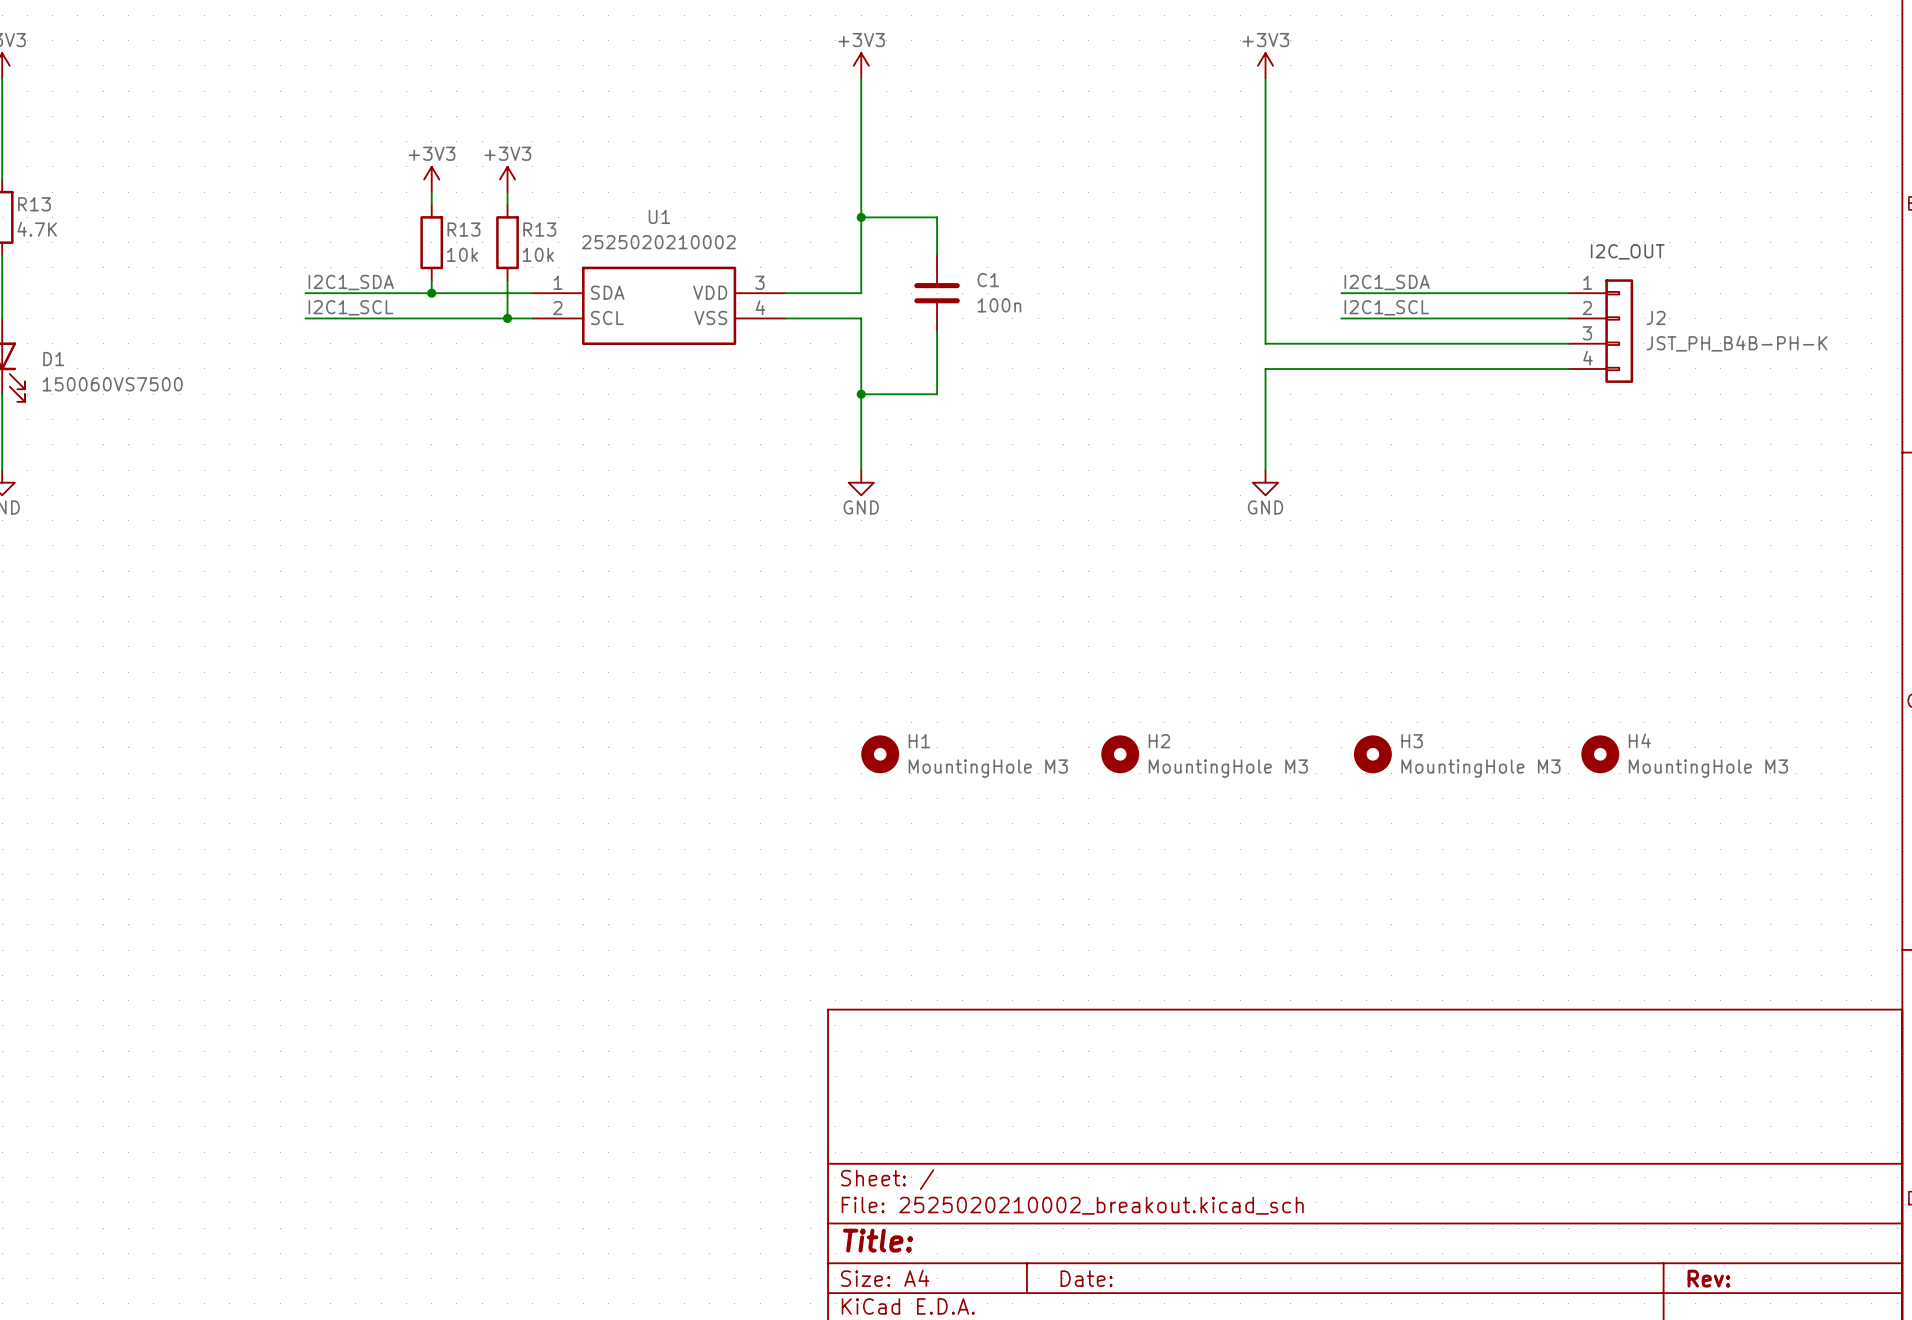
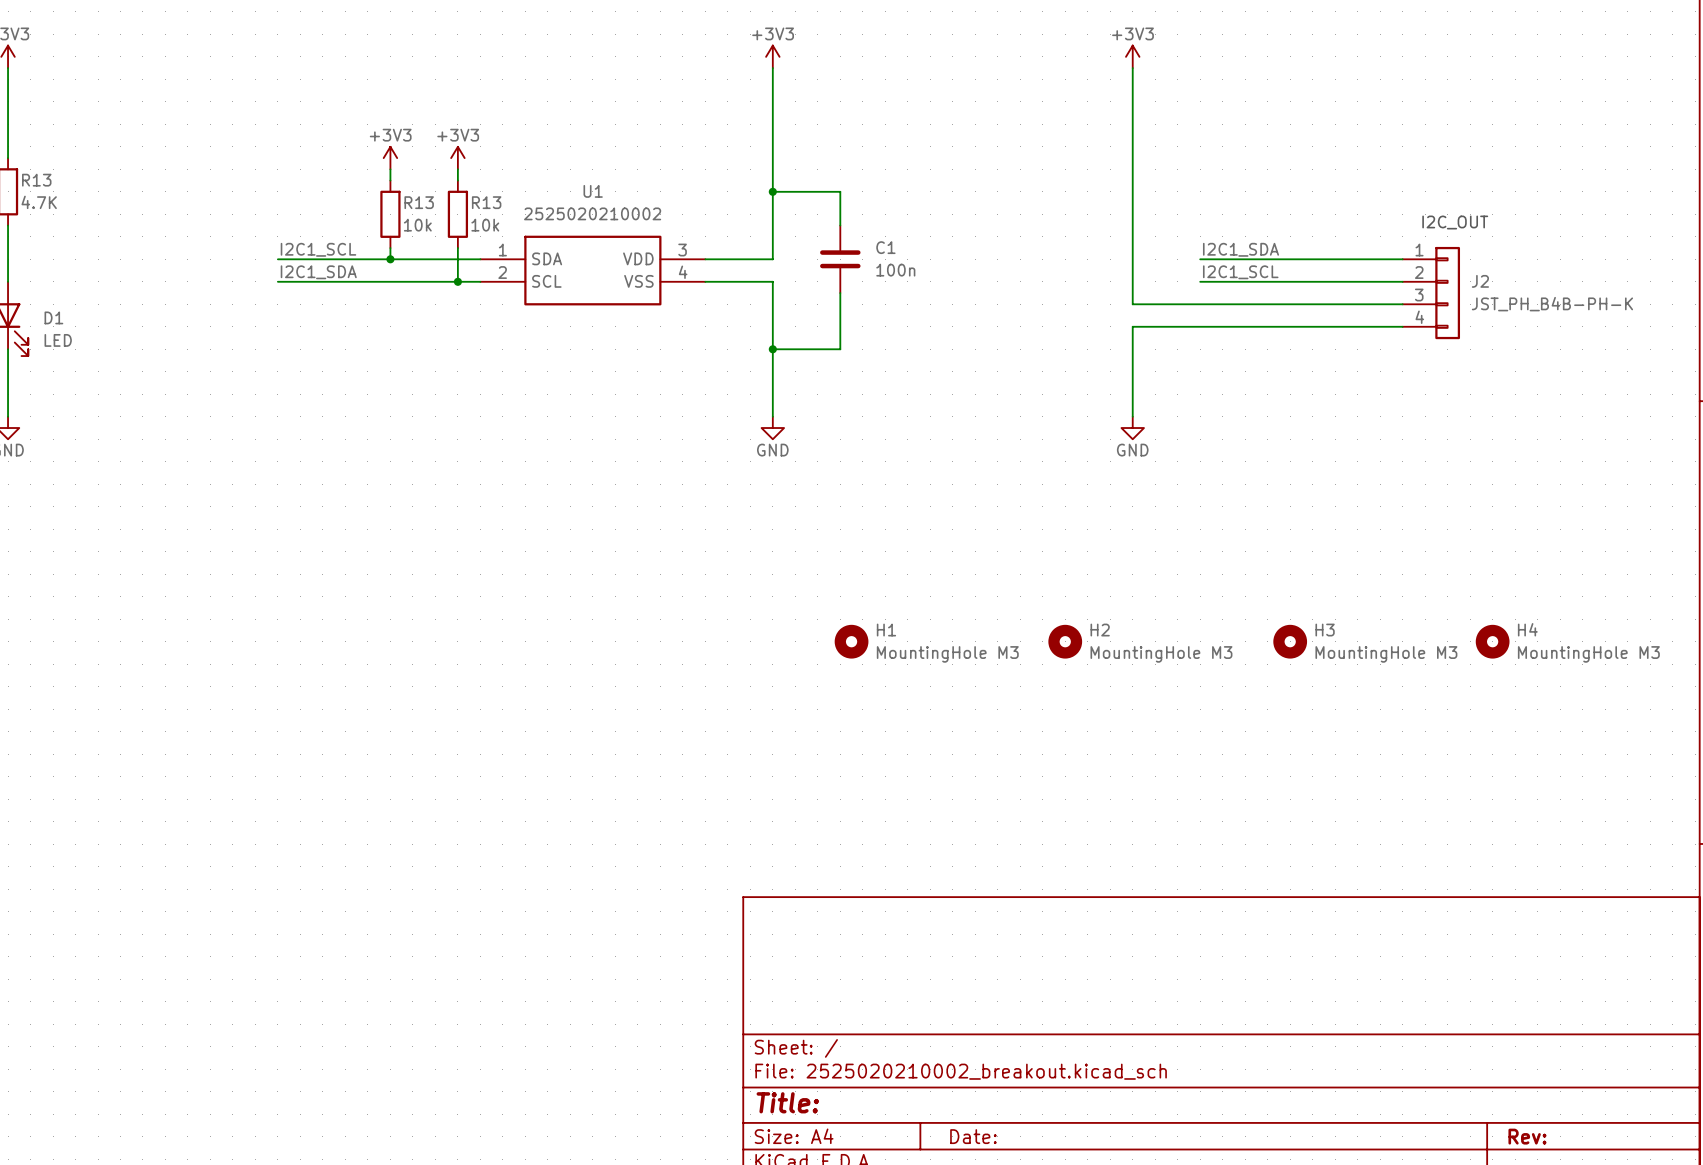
label: I2C1_SDA (351, 282) -> I2C1_SCL (318, 249)
label: I2C1_SCL (350, 307) -> I2C1_SDA (318, 272)
D1 value: 150060VS7500 (112, 384) -> LED (58, 340)
H1 position: (880, 754) -> (851, 641)
H2 position: (1120, 754) -> (1065, 641)
H3 position: (1372, 754) -> (1290, 641)
H4 position: (1600, 754) -> (1492, 641)

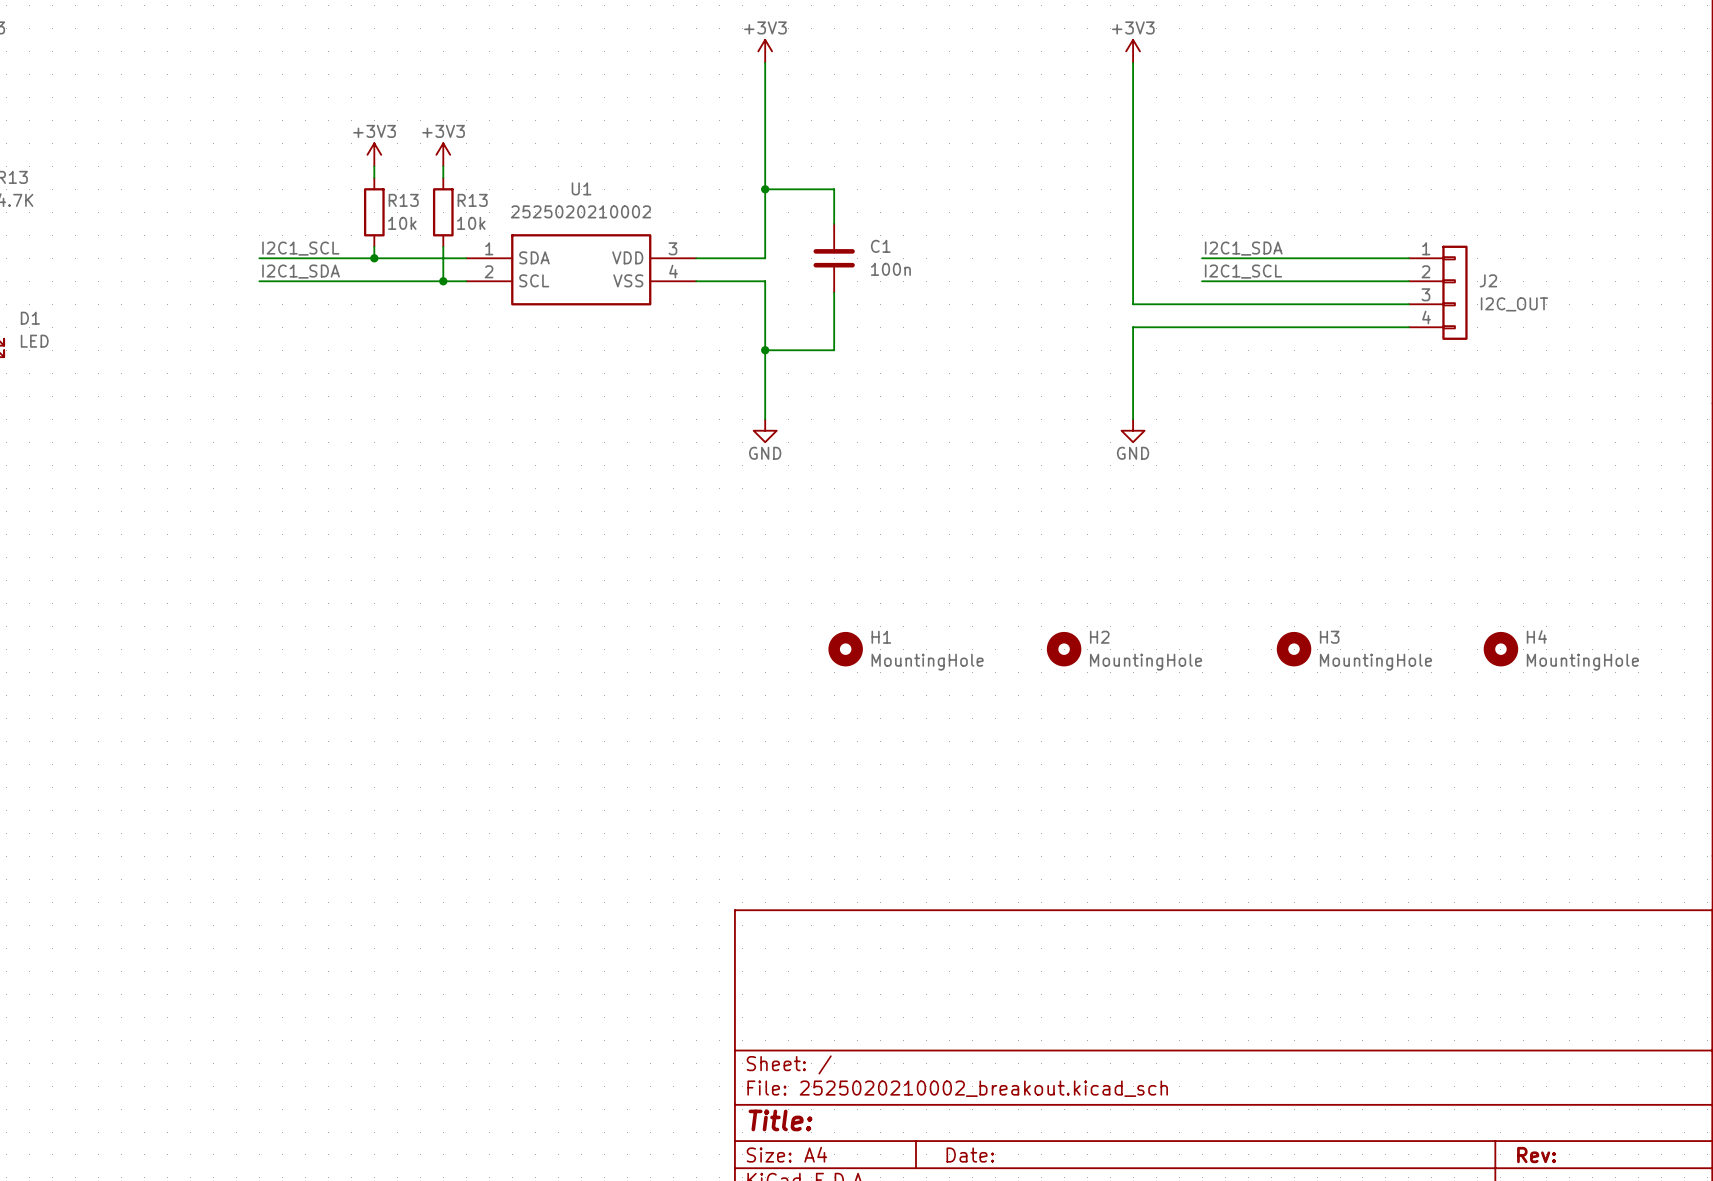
text: I2C_OUT (1455, 222) -> none
J2 value: JST_PH_B4B-PH-K (1552, 304) -> I2C_OUT (1514, 304)
H1 value: MountingHole M3 (947, 654) -> MountingHole (927, 662)
H2 value: MountingHole M3 (1161, 654) -> MountingHole (1146, 662)
H3 value: MountingHole M3 (1386, 654) -> MountingHole (1375, 662)
H4 value: MountingHole M3 (1588, 654) -> MountingHole (1582, 662)

